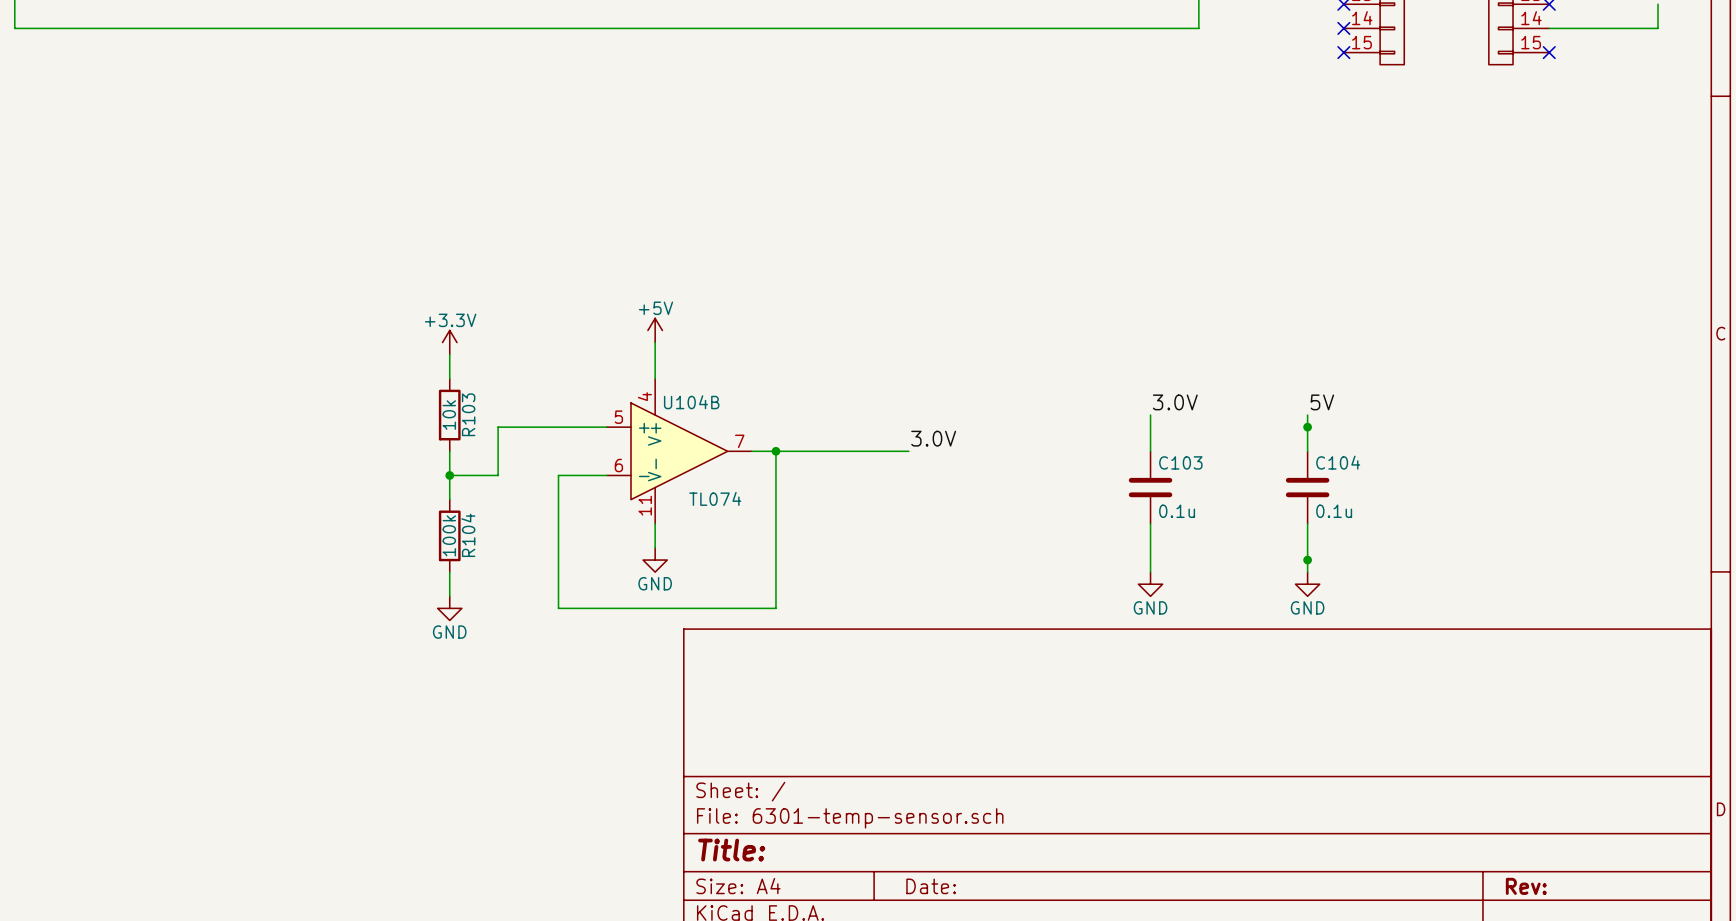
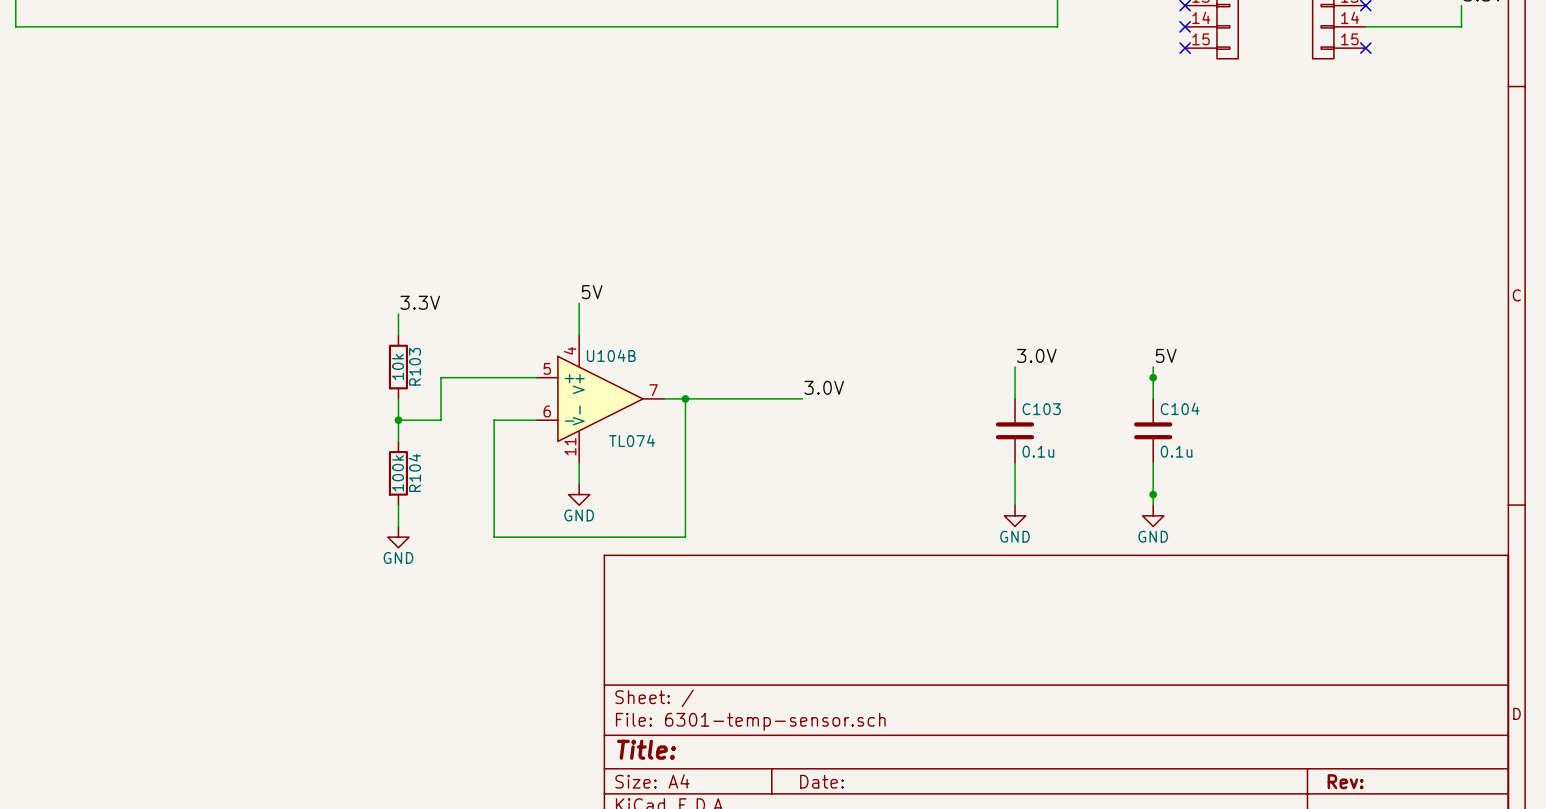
label: none -> 5V (592, 292)
power symbol: +5V (655, 330) -> none
label: none -> 3.3V (420, 302)
power symbol: +3.3V (449, 342) -> none

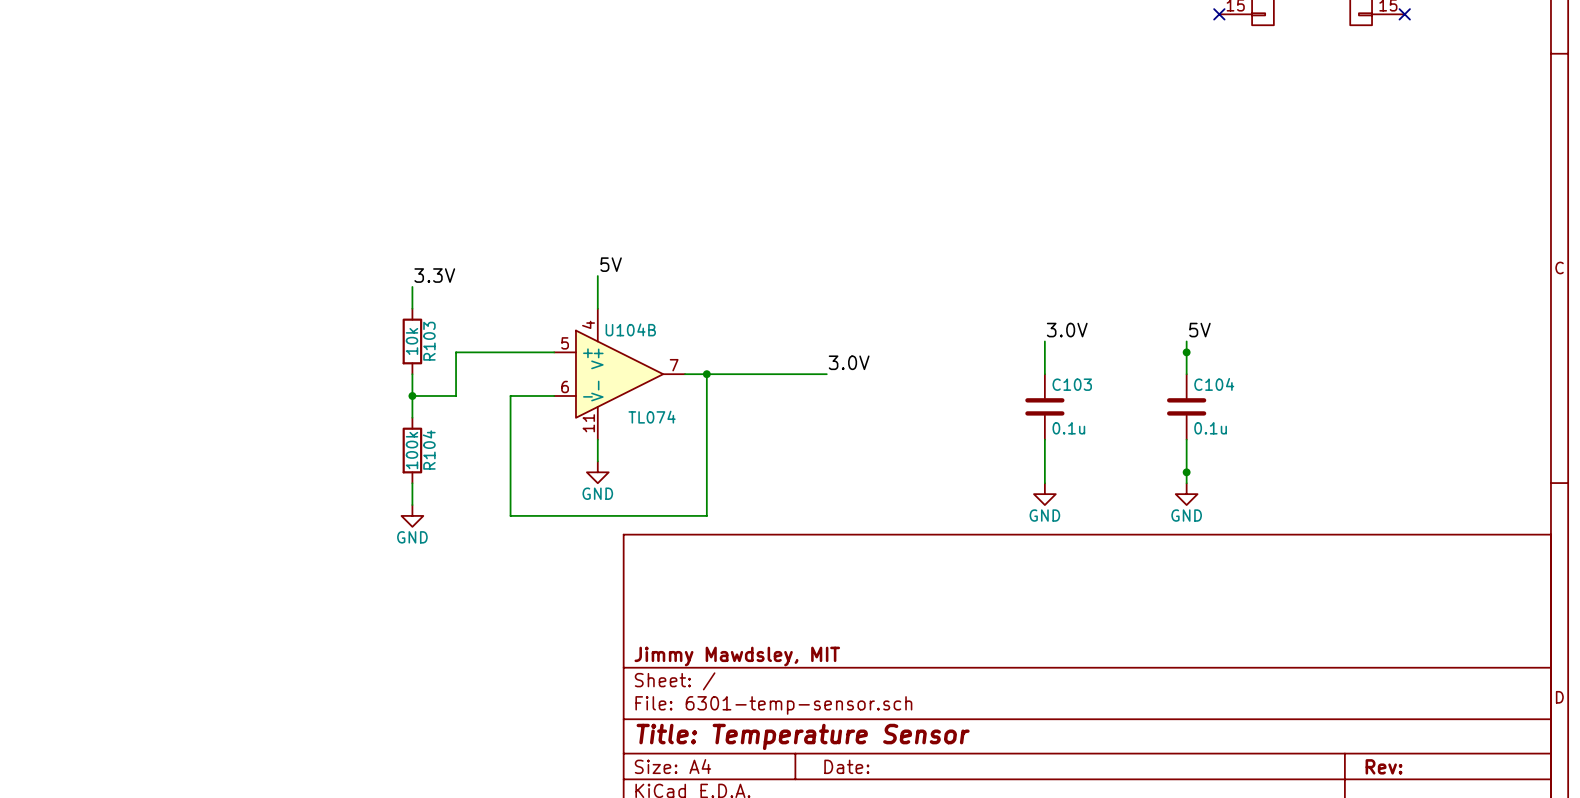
title block: none -> Jimmy Mawdsley, MIT (737, 656)
title block: Title: (646, 749) -> Title: Temperature Sensor (803, 736)

